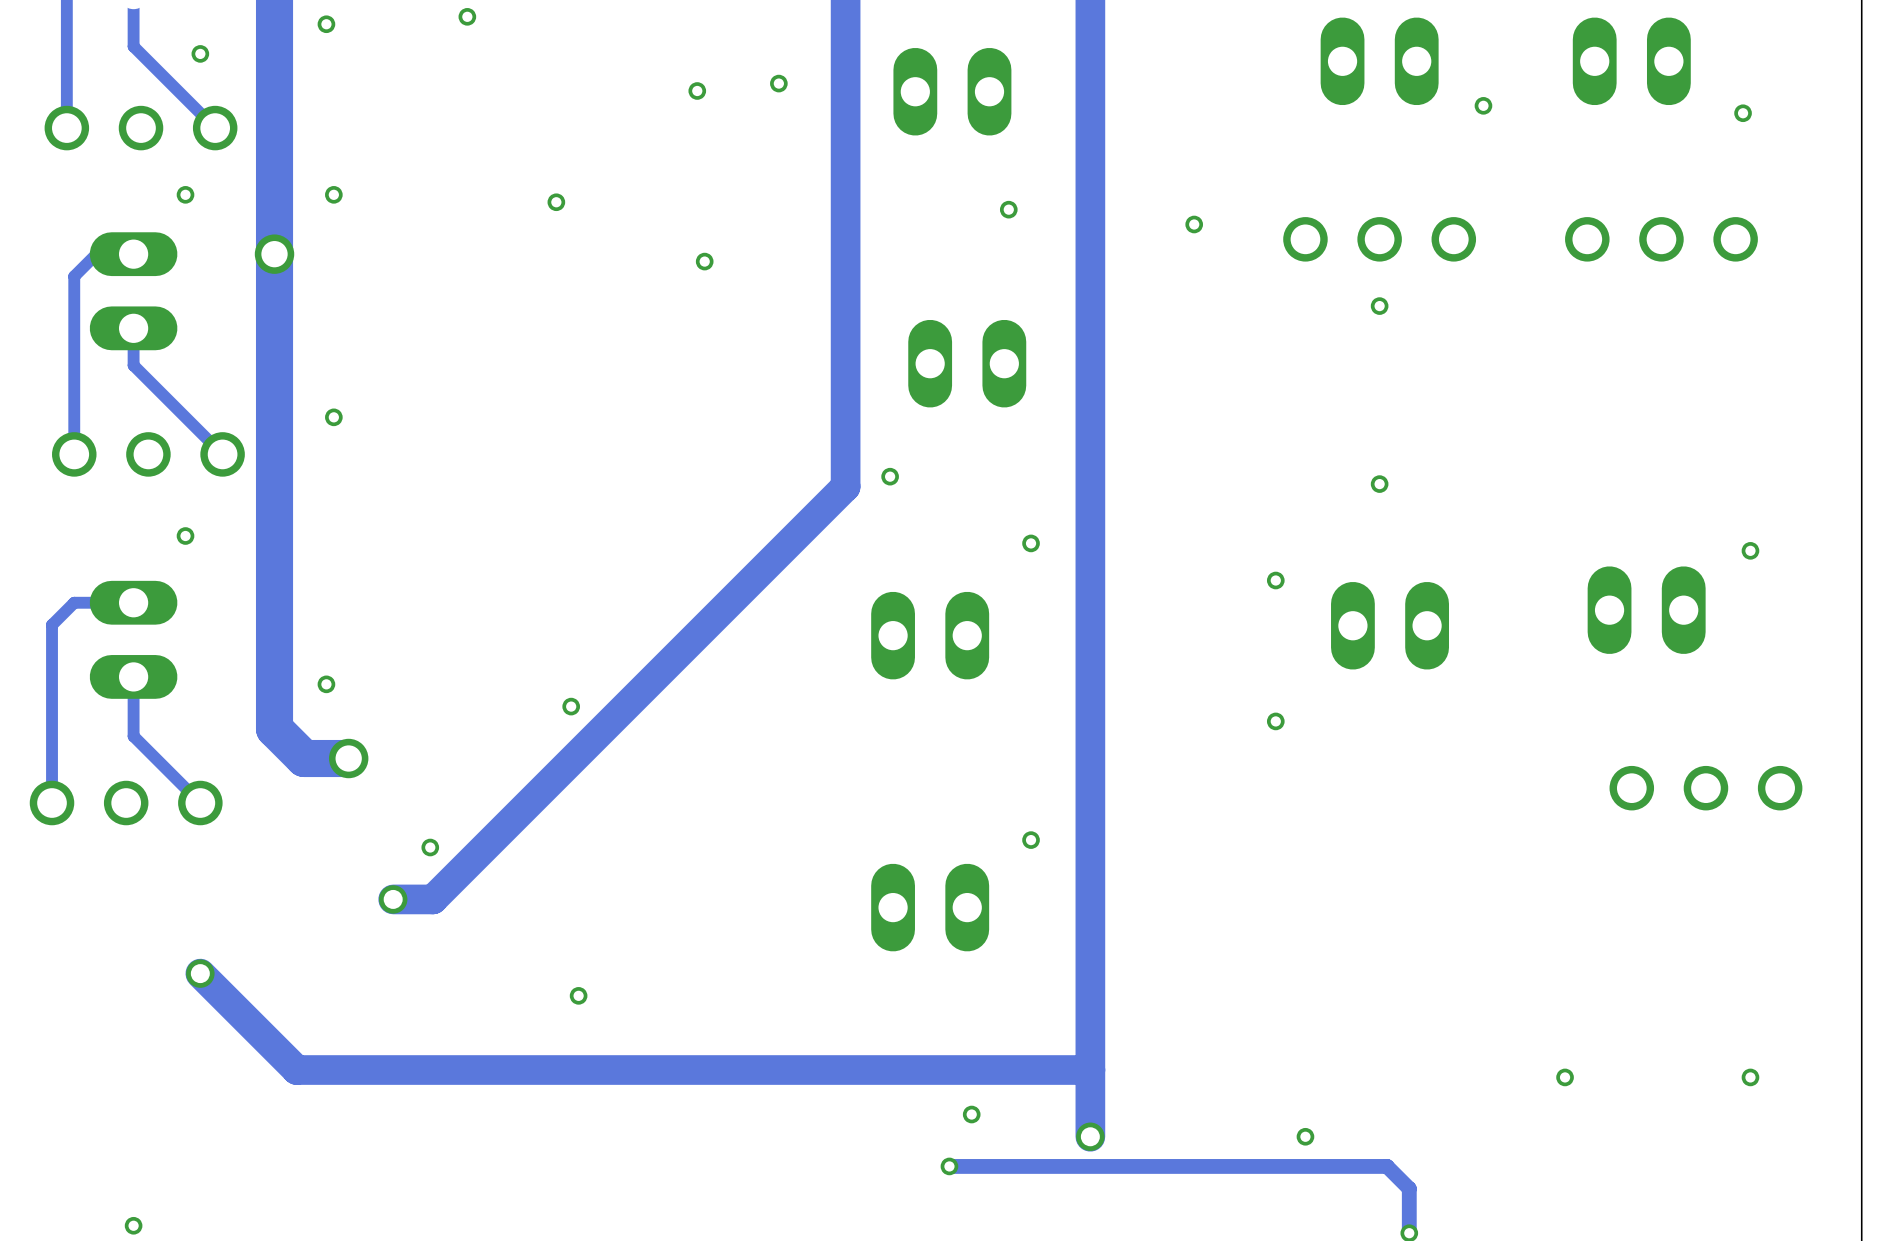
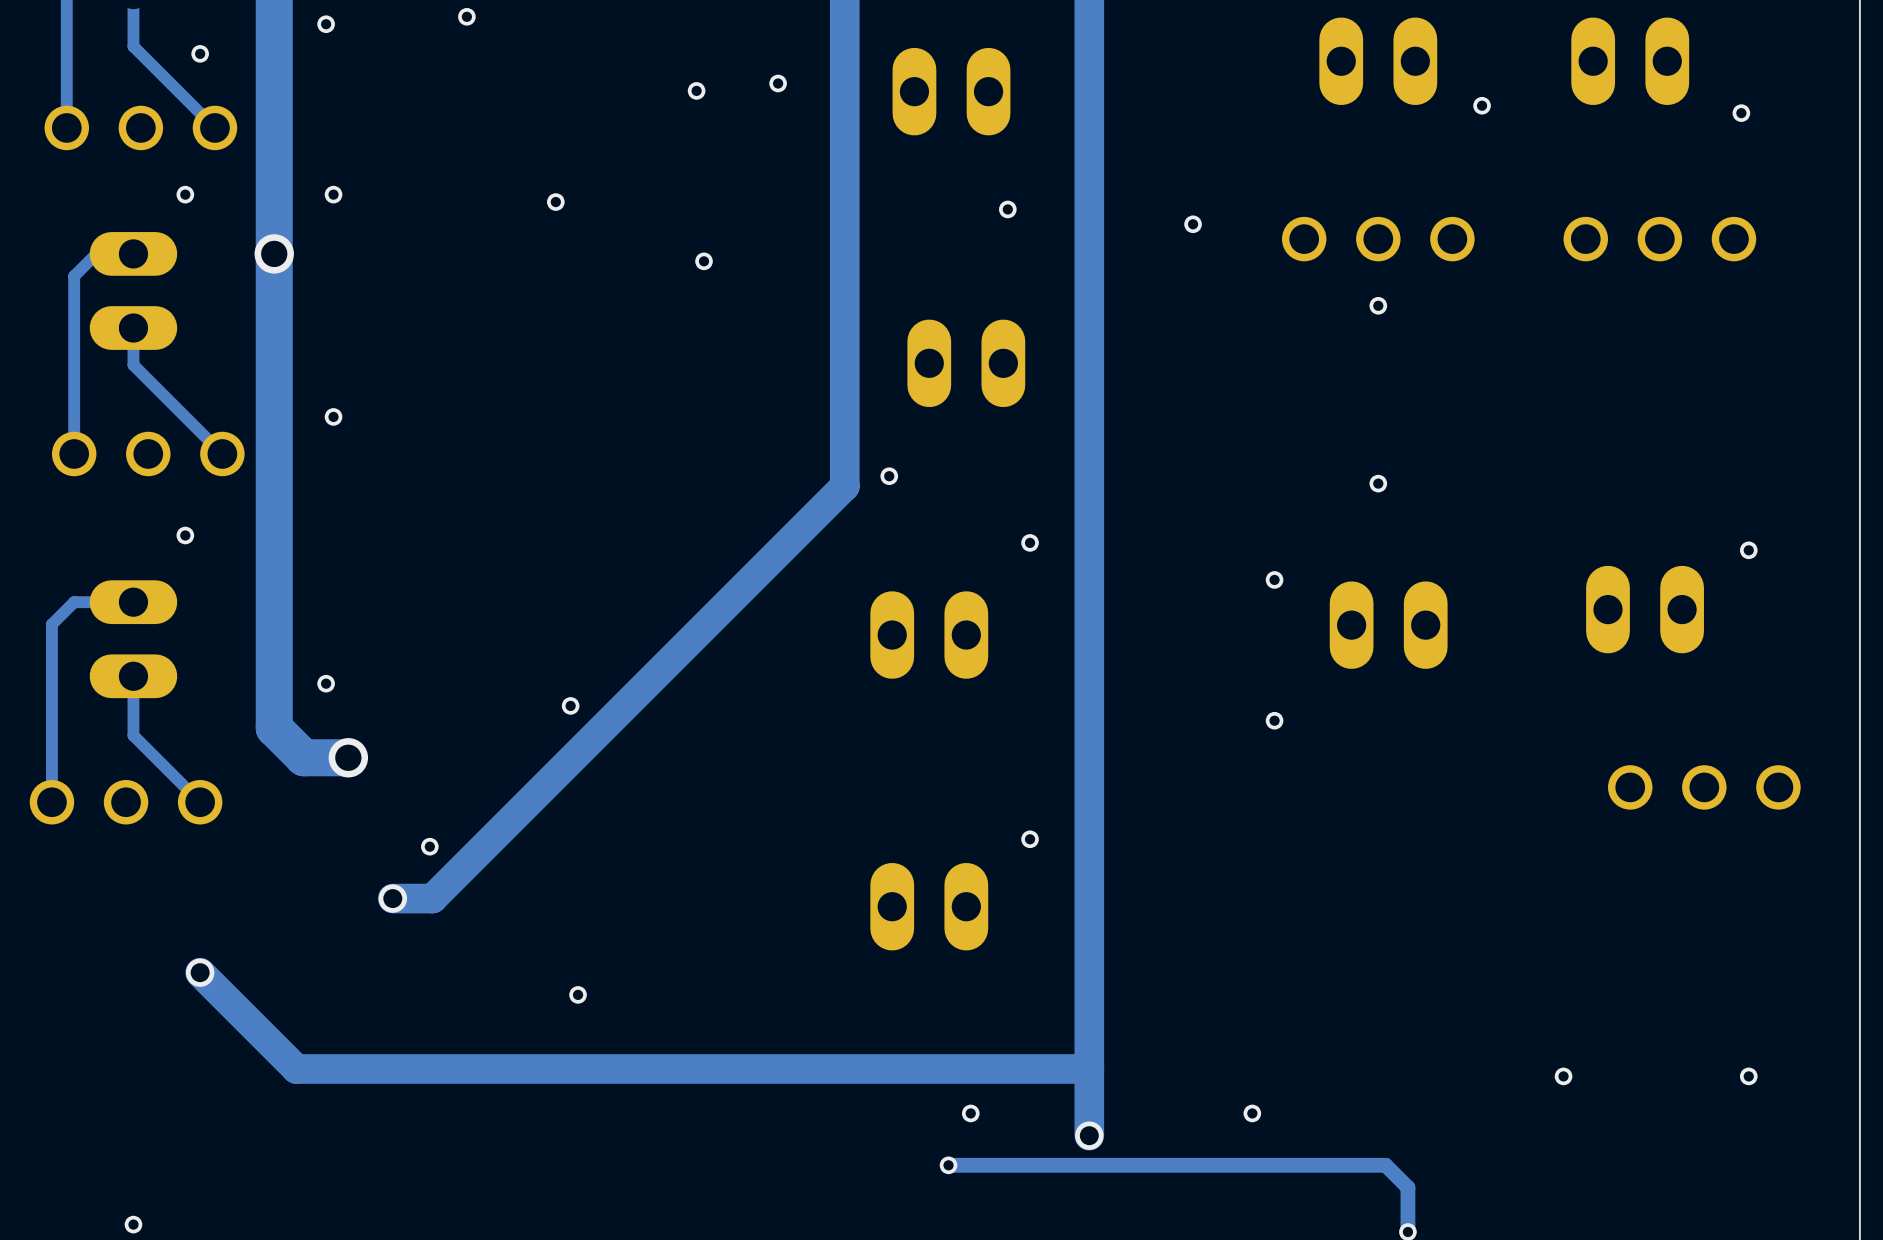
via position: (1305, 1136) -> (1252, 1113)

